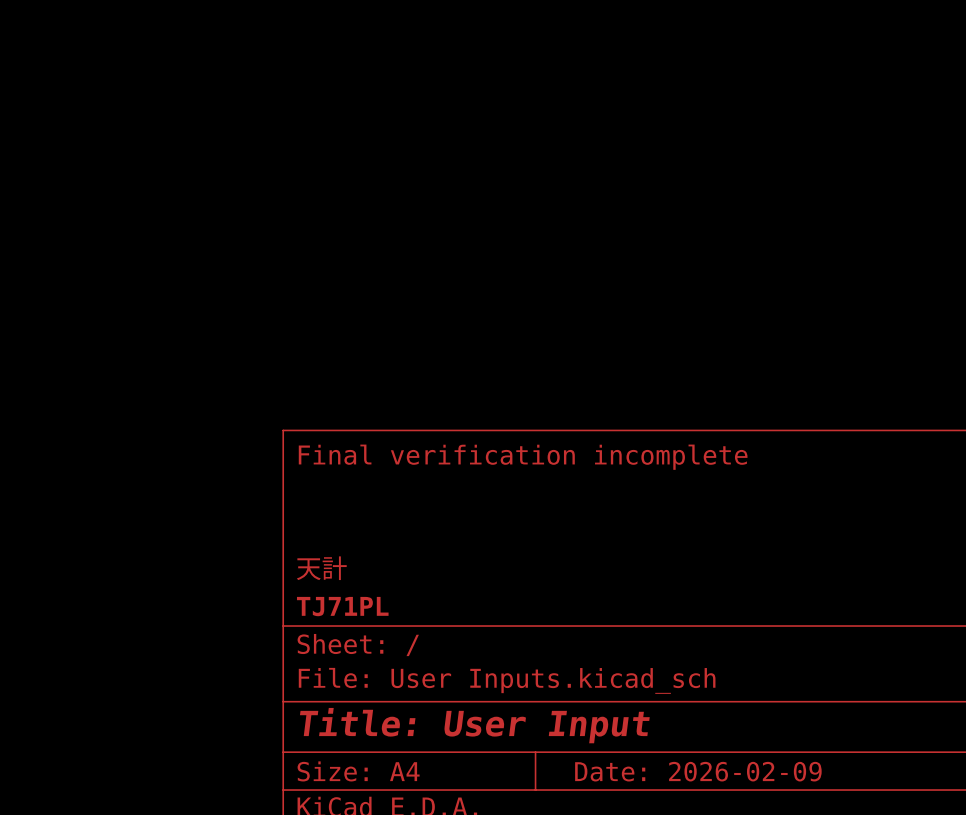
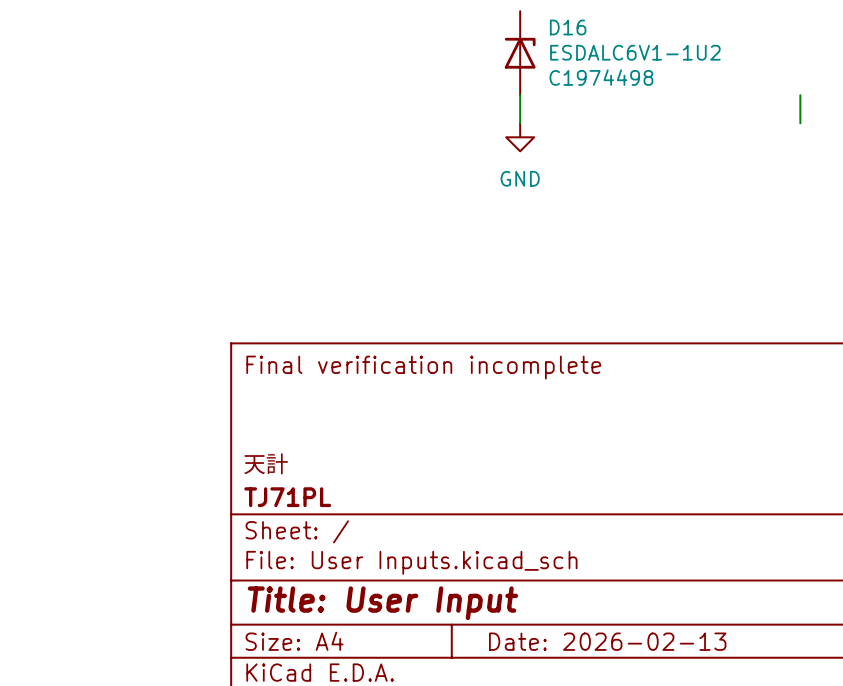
D16: none -> ESDALC6V1-1U2 (520, 53)
wire: none -> (520, 95) (520, 123)
wire: none -> (800, 95) (800, 123)
power symbol: none -> GND (520, 137)
title block: Date: 2026-02-09 (698, 771) -> Date: 2026-02-13 (607, 641)

